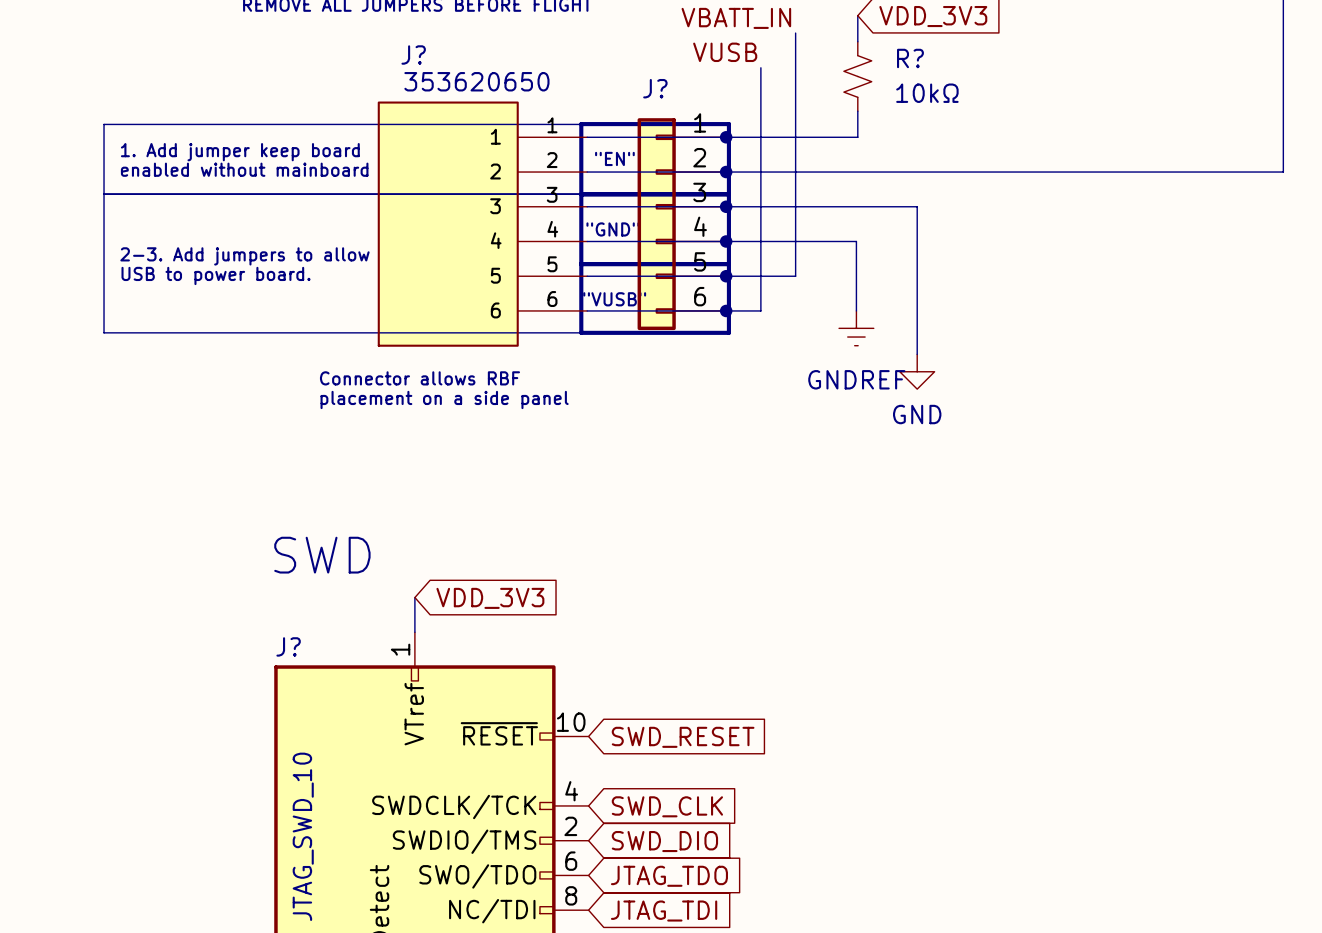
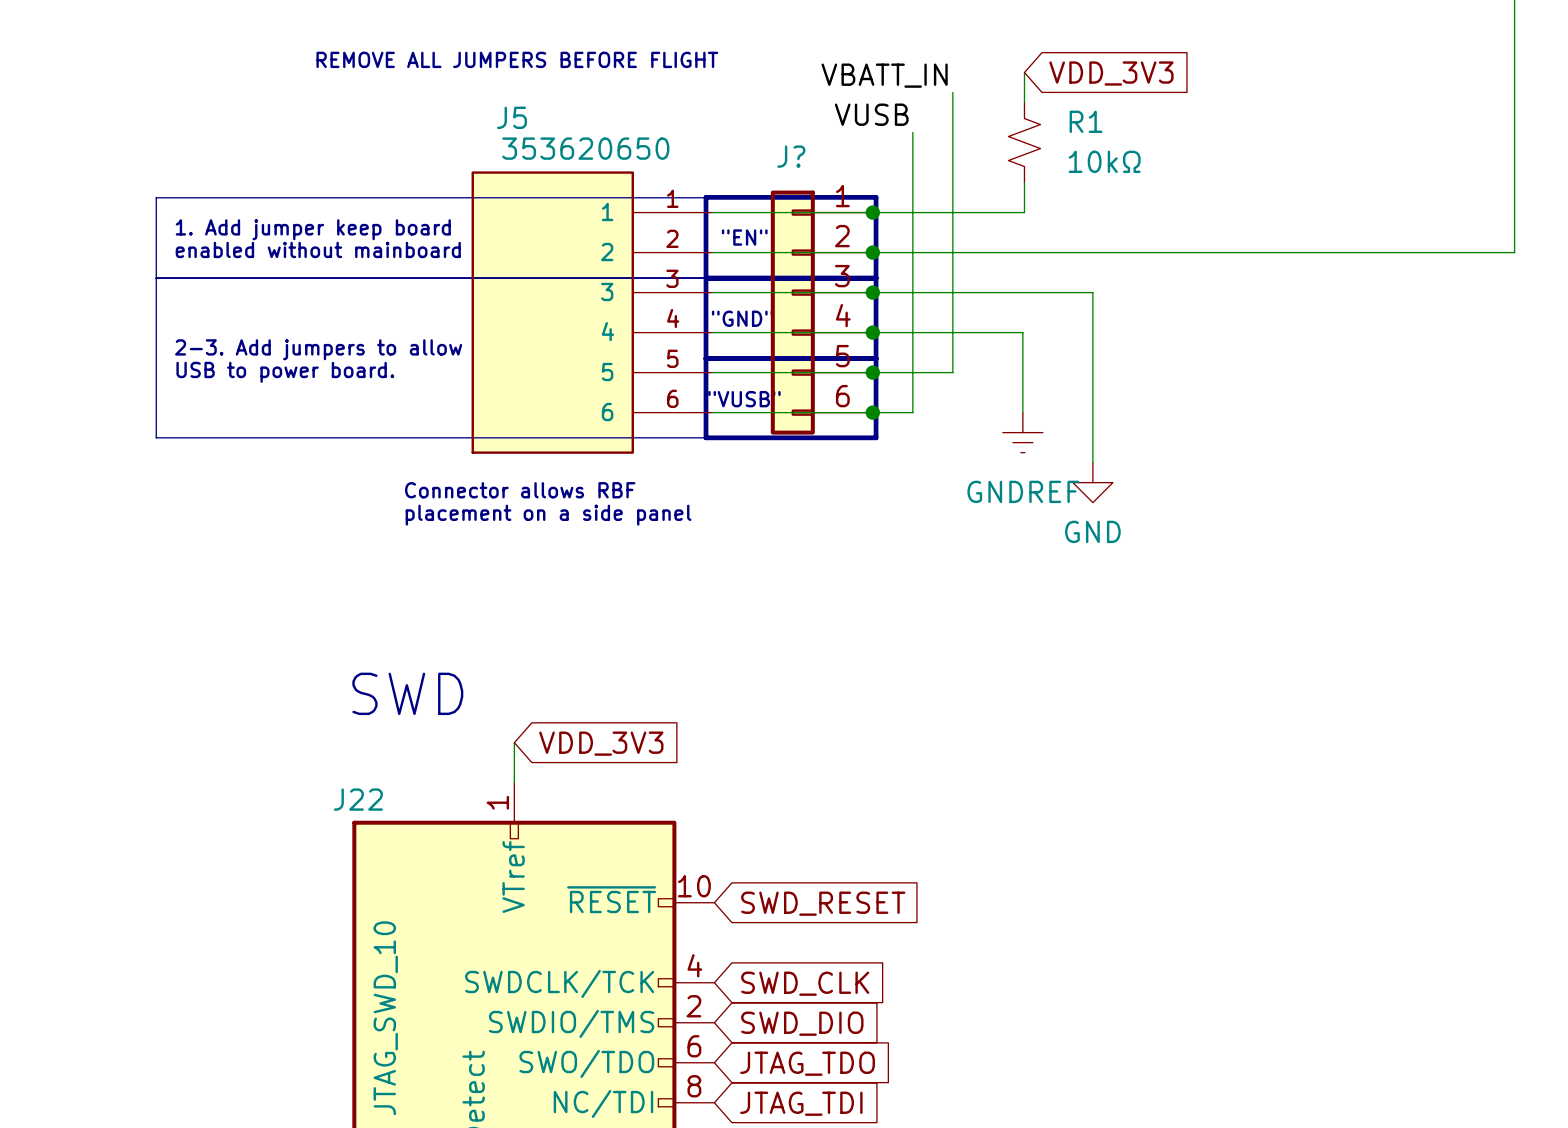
J? name: J? (413, 55) -> J5 (511, 117)
R? name: R? (910, 58) -> R1 (1086, 121)
J? name: J? (288, 646) -> J22 (358, 799)

